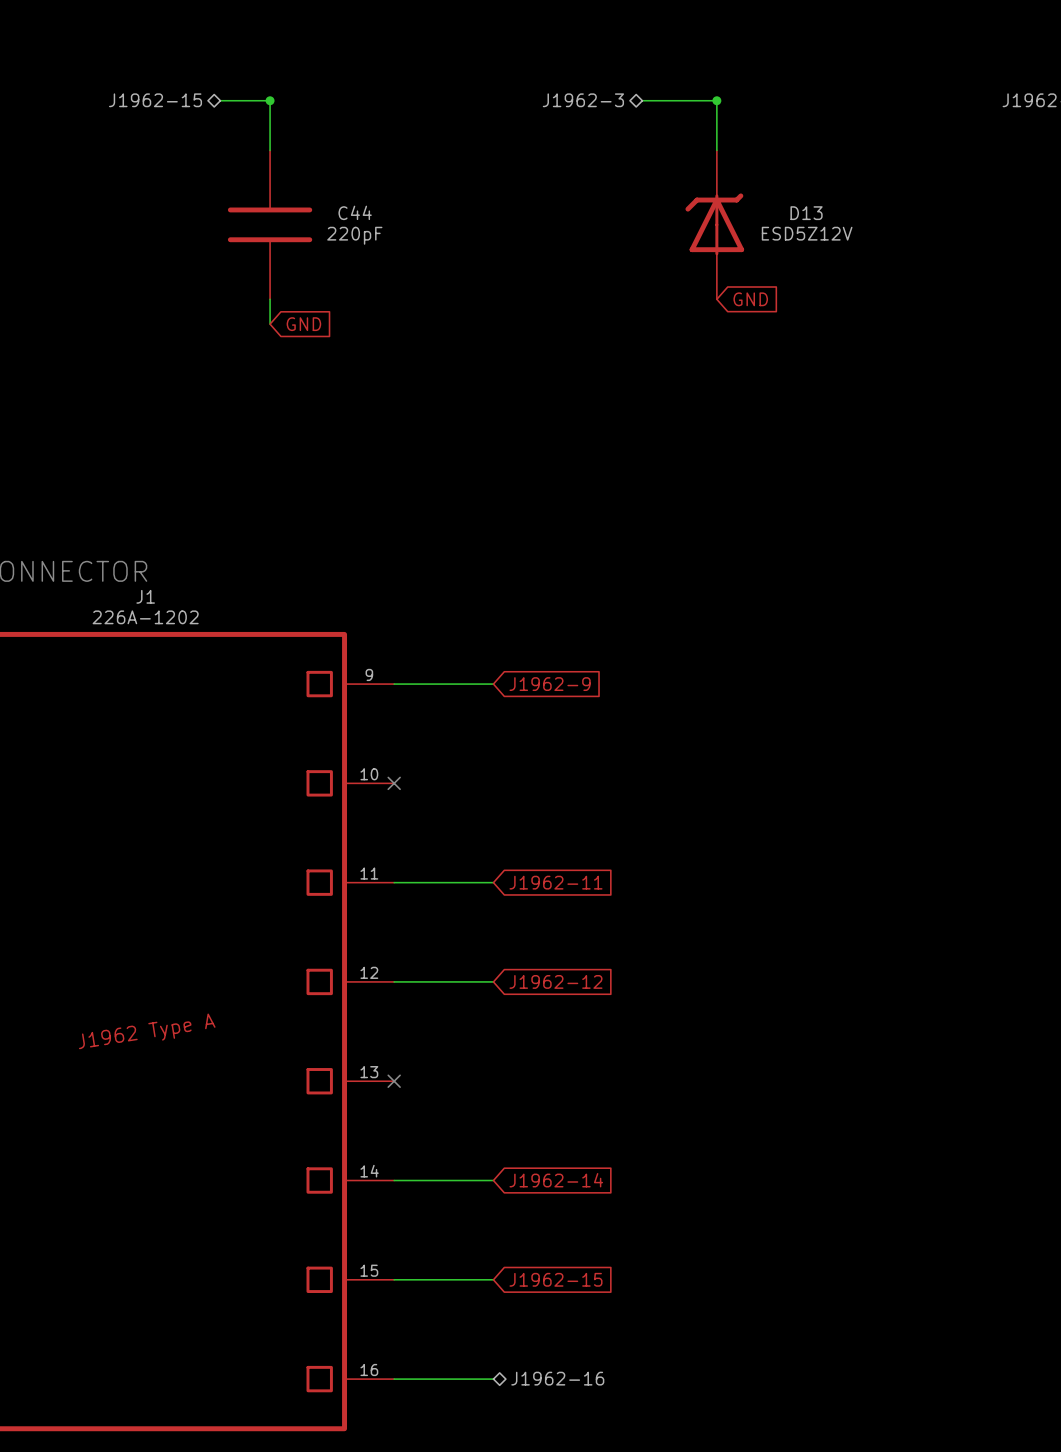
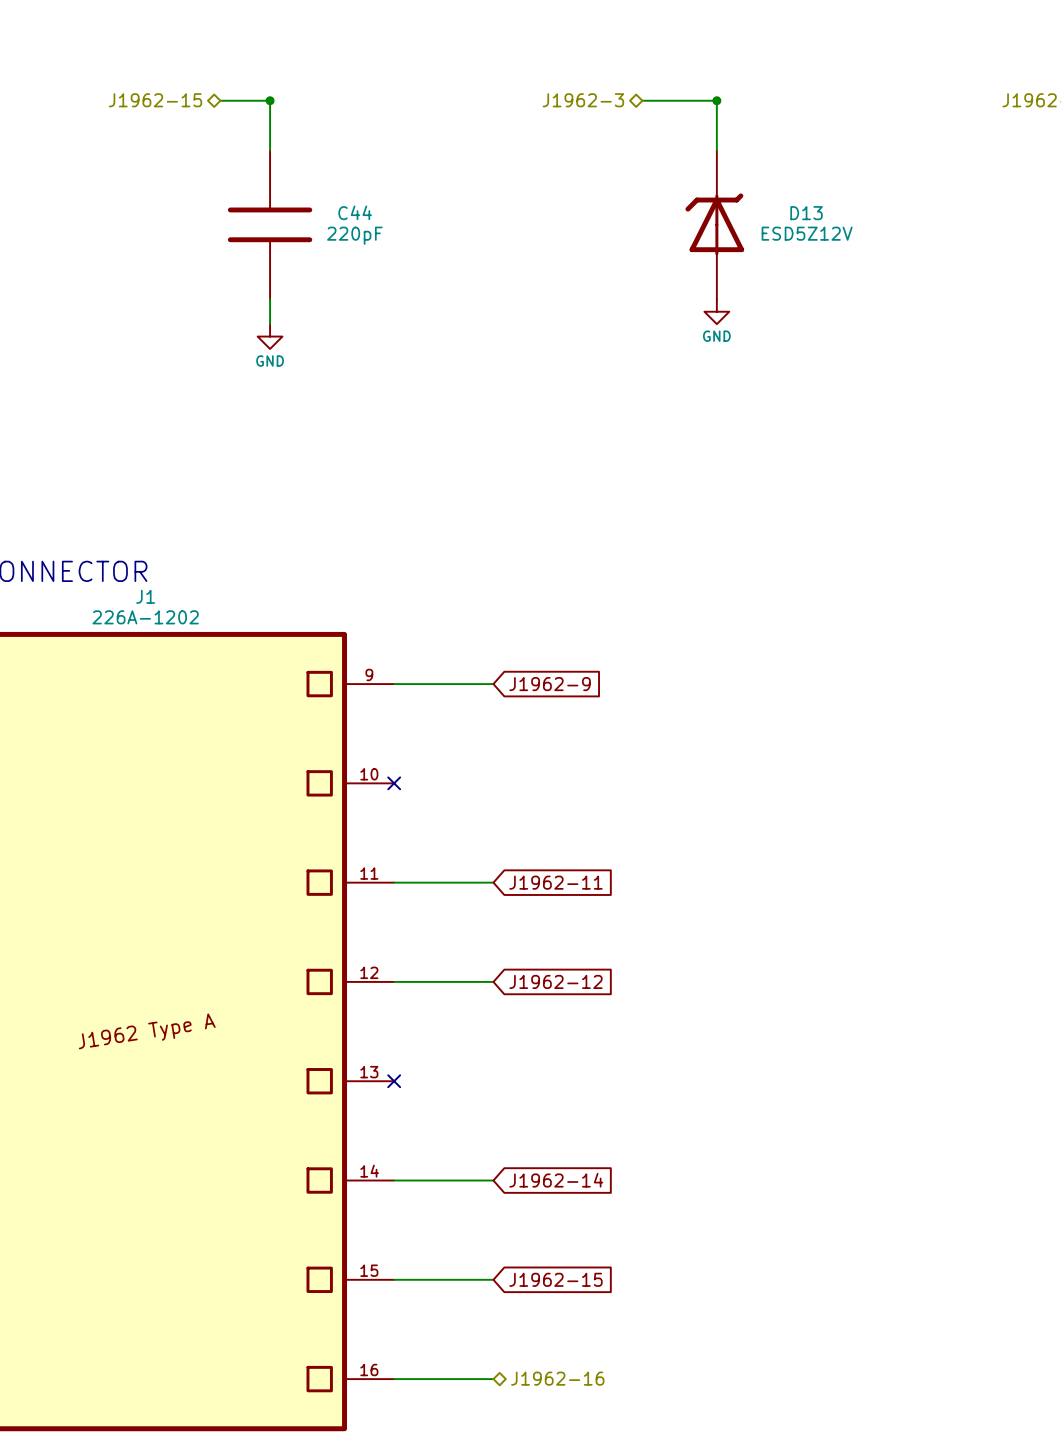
global label: GND (750, 299) -> none
power symbol: none -> GND (716, 311)
global label: GND (303, 324) -> none
power symbol: none -> GND (270, 336)

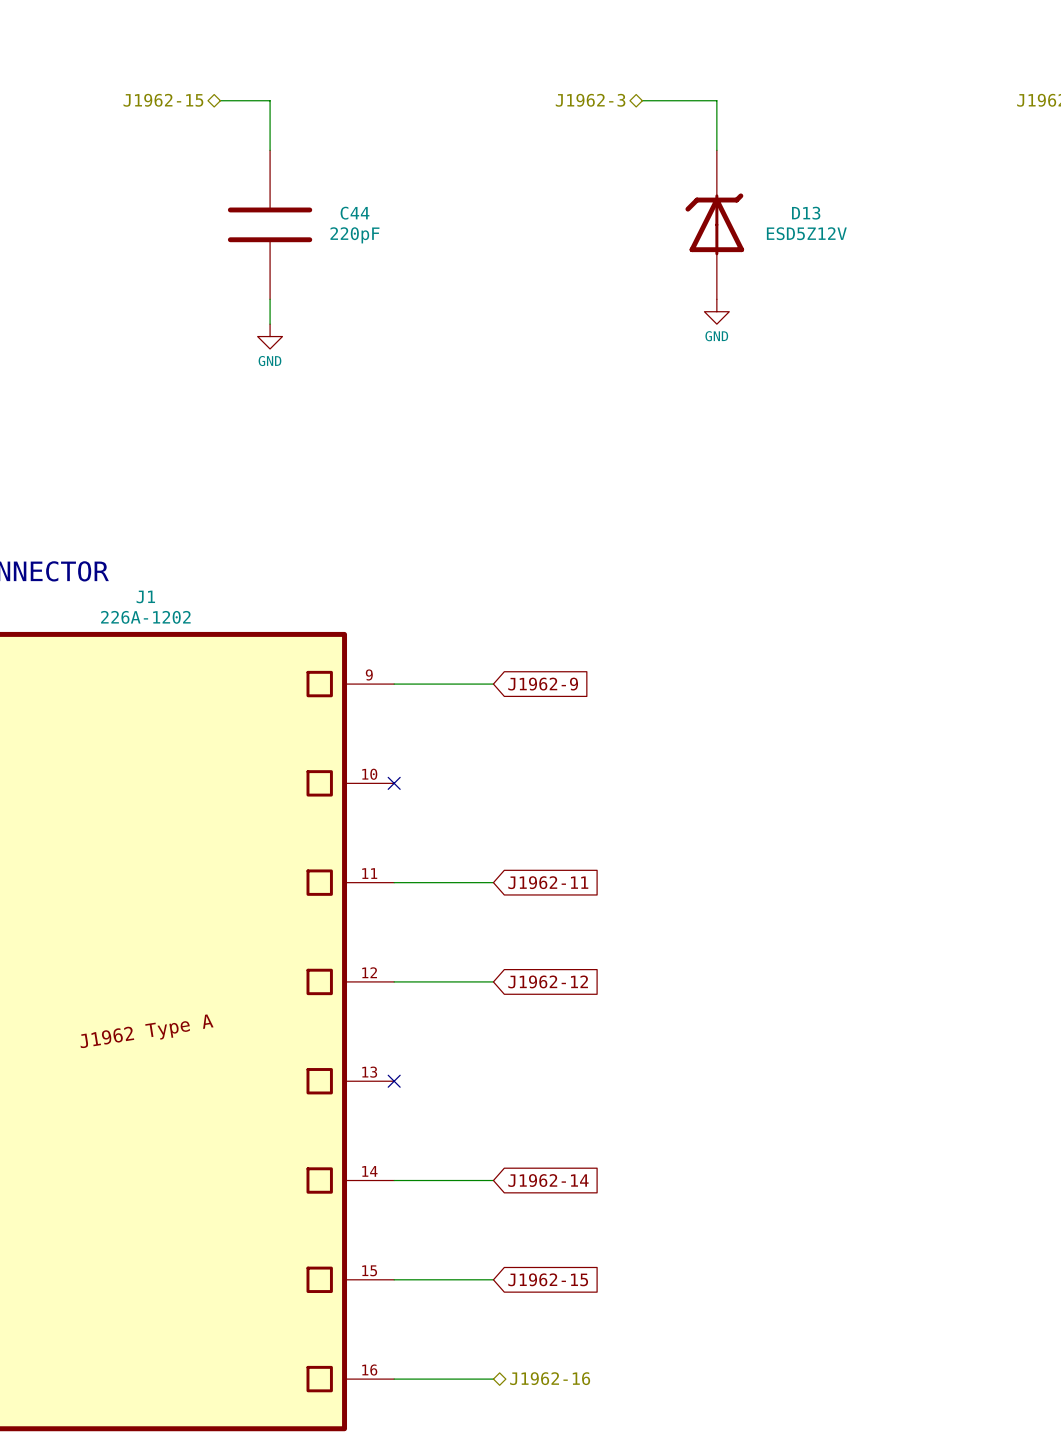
junction: (270, 100) -> none
junction: (716, 100) -> none

